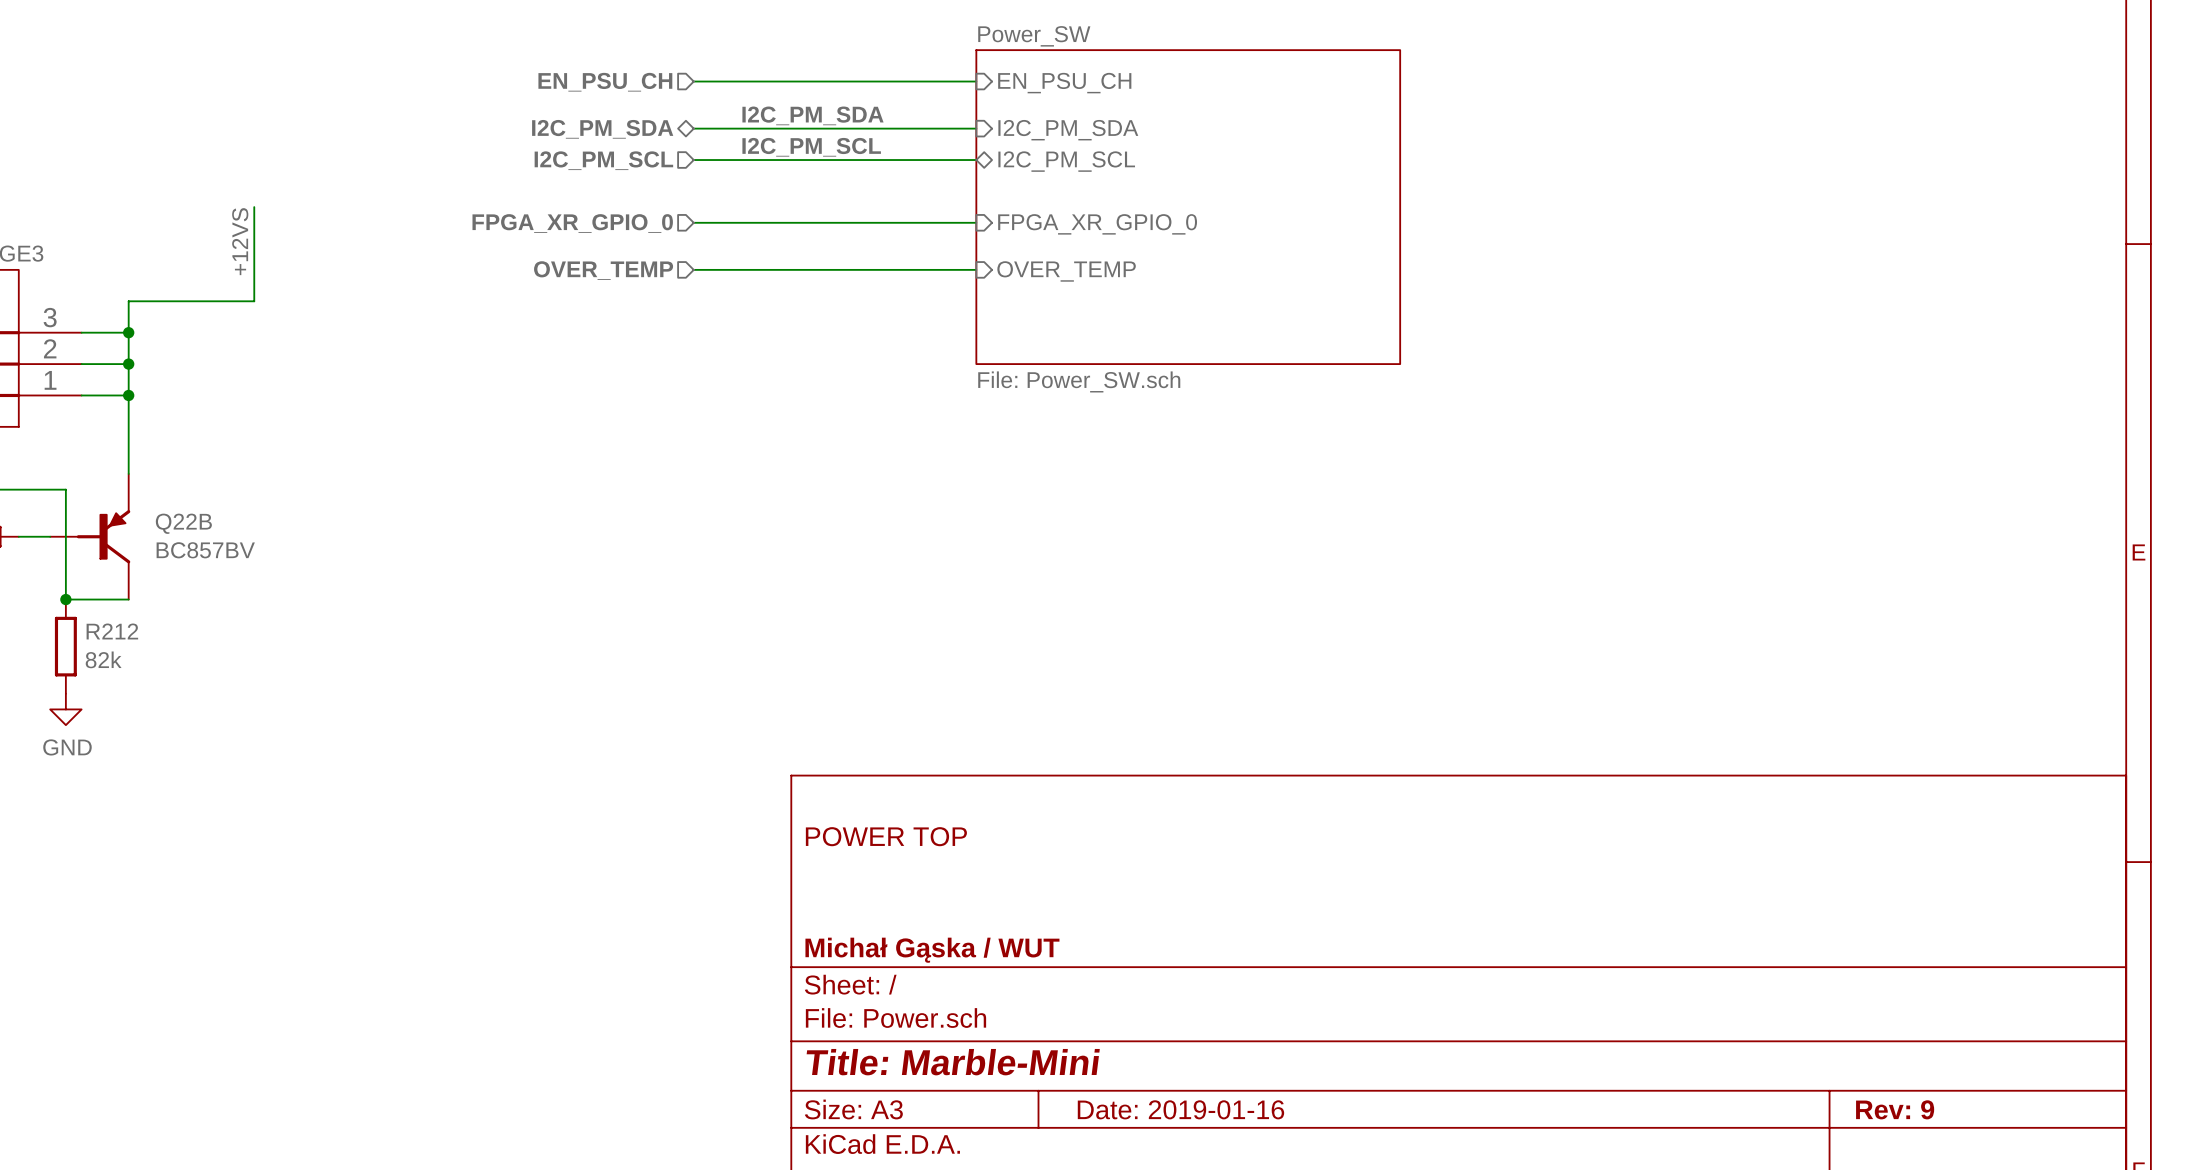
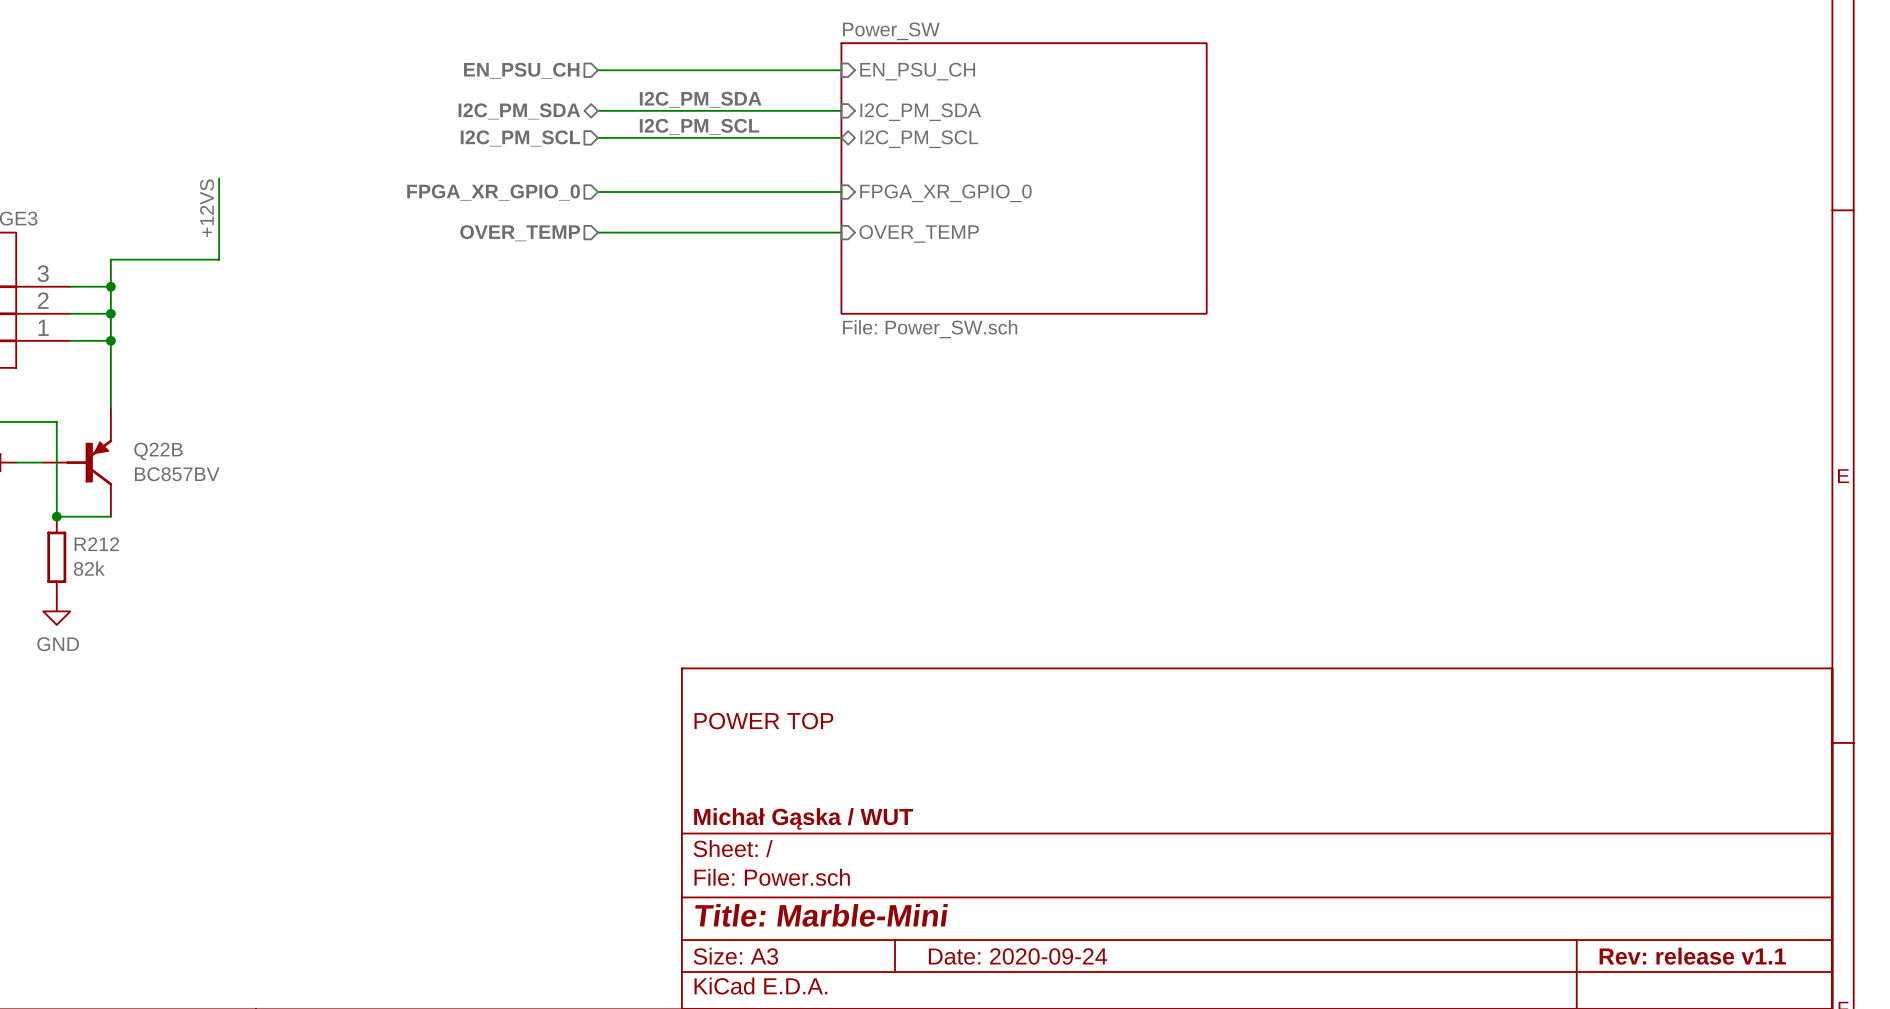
title block: Date: 2019-01-16 (1180, 1109) -> Date: 2020-09-24 (1017, 956)
title block: Rev: 9 (1895, 1109) -> Rev: release v1.1 (1692, 956)

